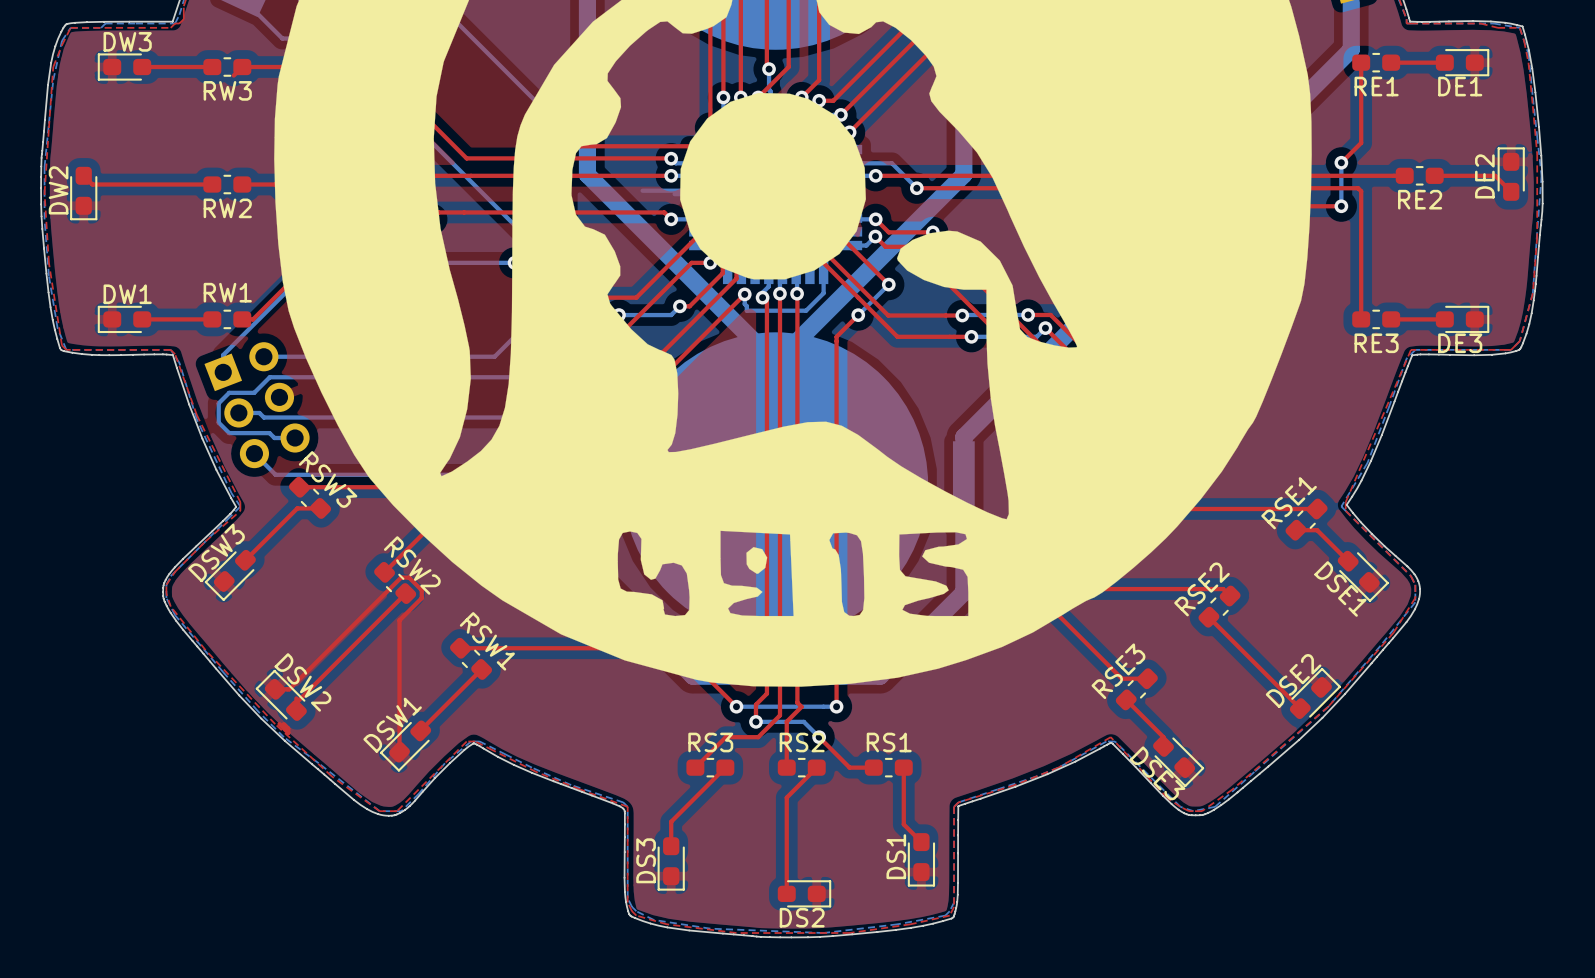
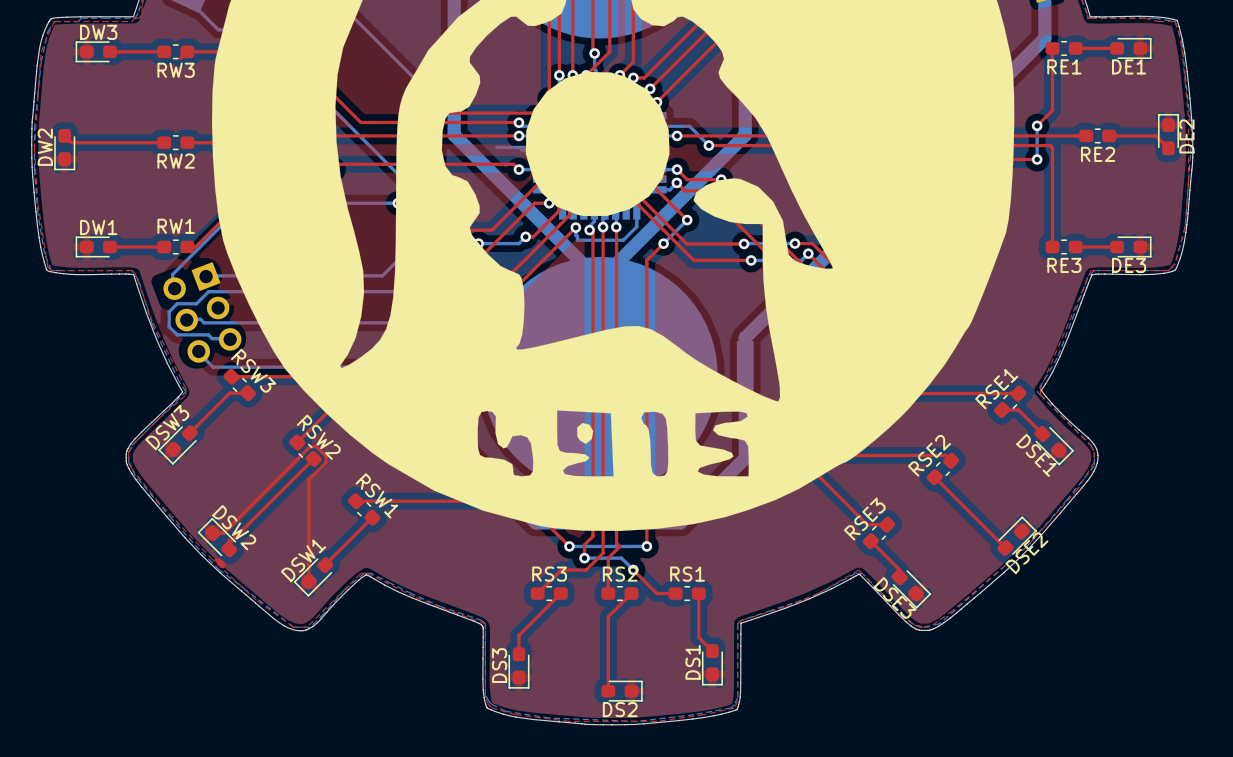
DE2 name position: DE2 (1484, 176) -> DE2 (1186, 136)
part footprint: [204, 342, 310, 469] -> [163, 262, 242, 363]
DSE2 name position: DSE2 (1293, 681) -> DSE2 (1026, 553)

